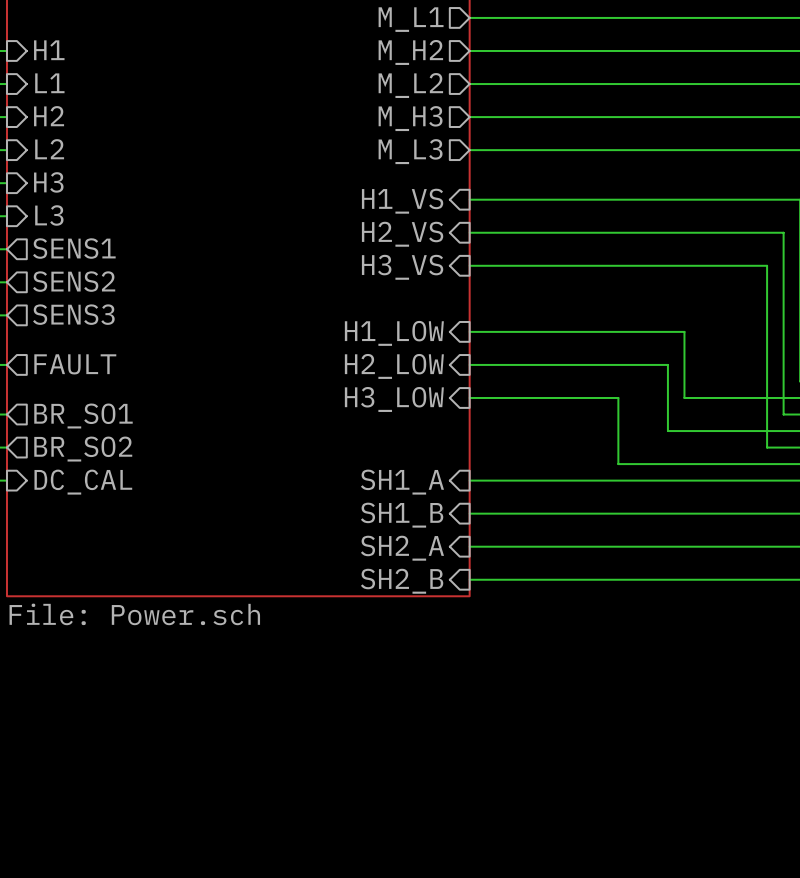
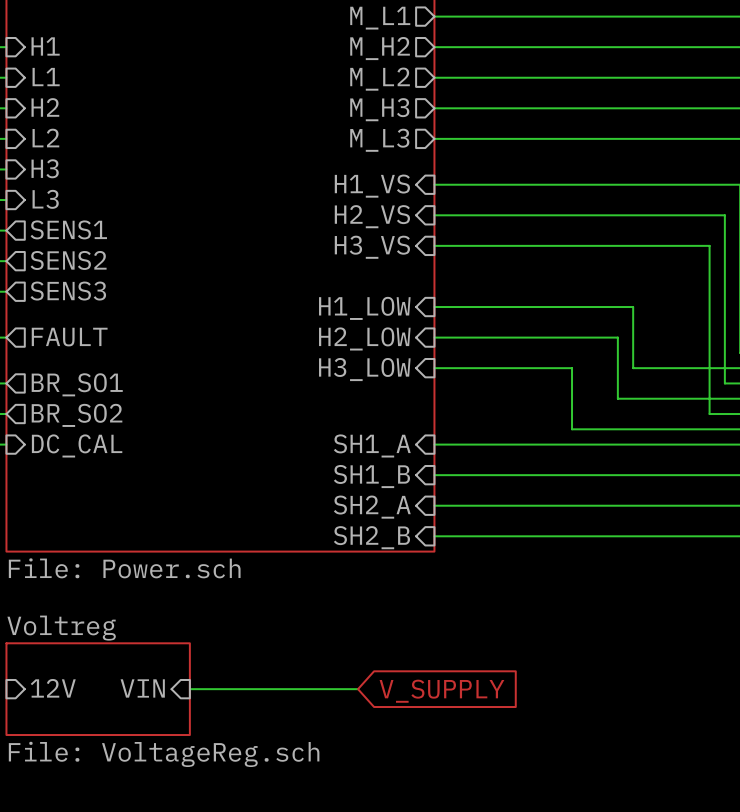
sheet pin: none -> 12V (53, 688)
sheet Voltreg: none -> File: VoltageReg.sch (98, 689)
sheet pin: none -> VIN (142, 688)
wire: none -> (189, 689) (358, 689)
global label: none -> V_SUPPLY (441, 691)

